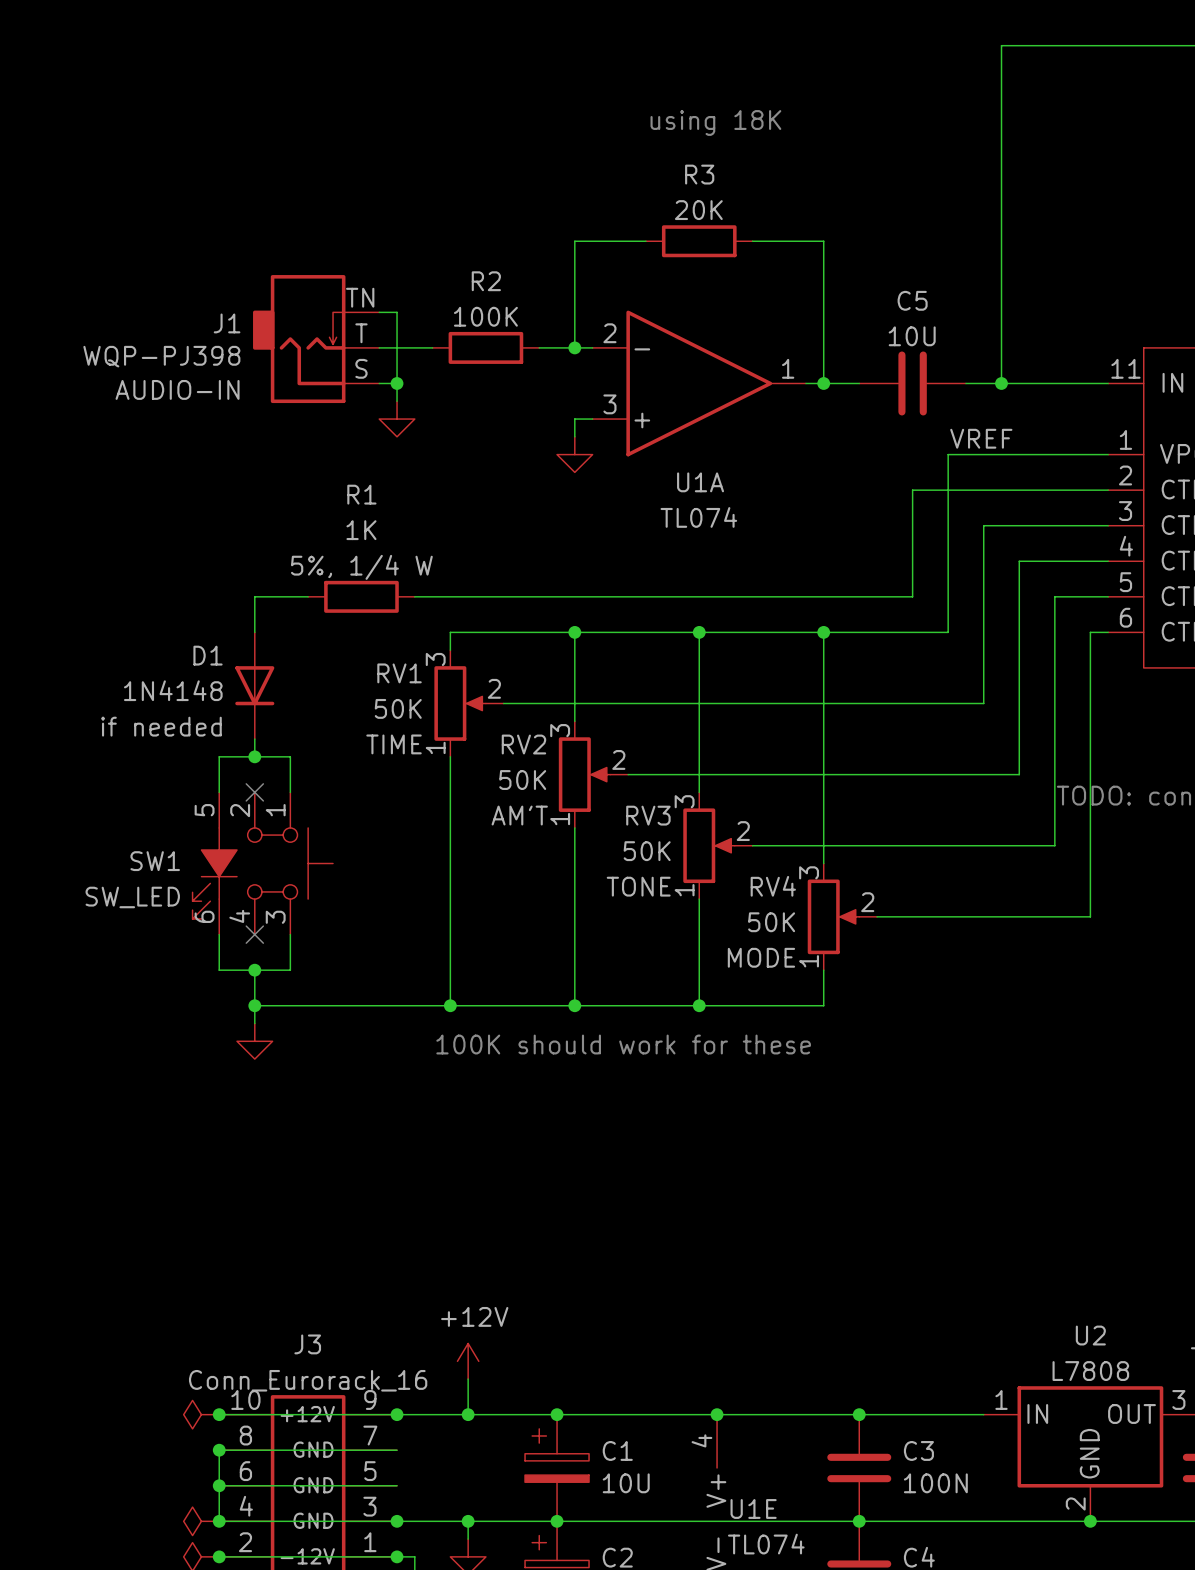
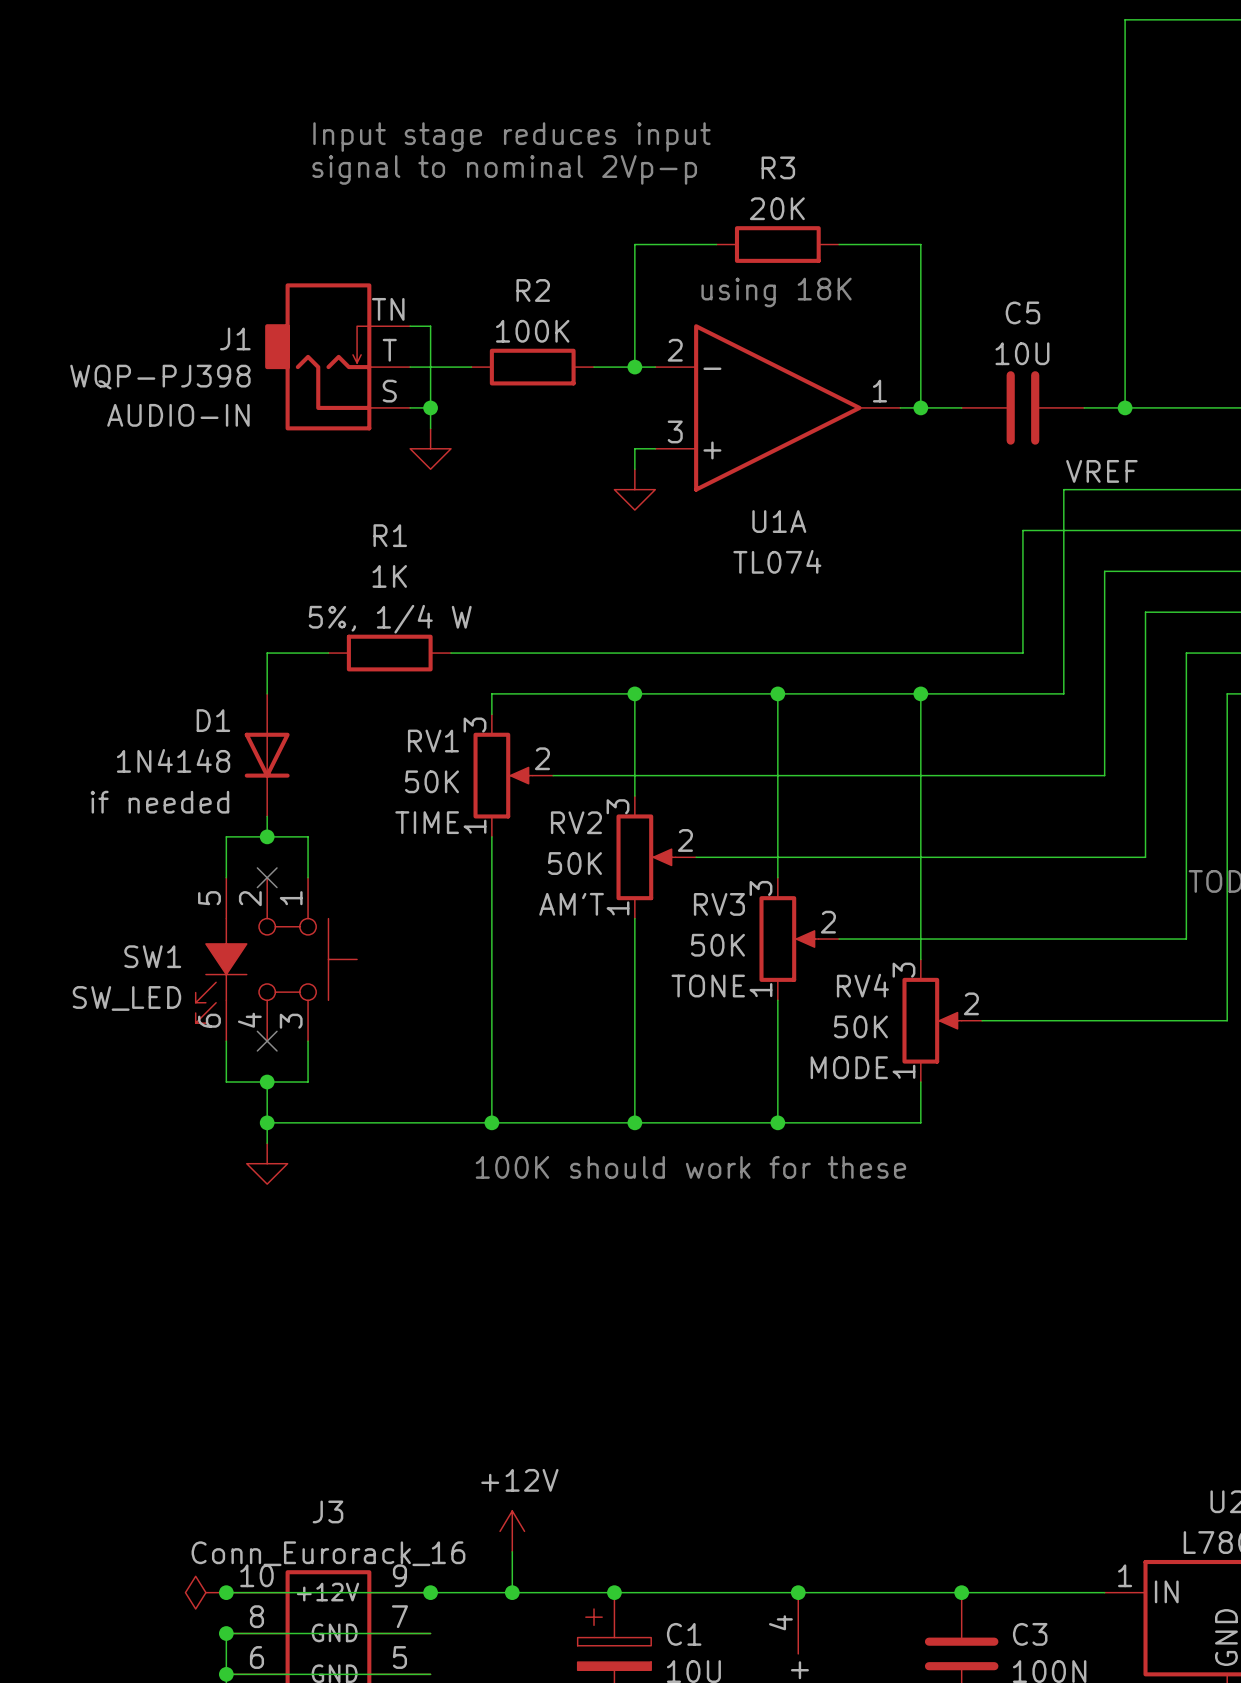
text position: using 18K (715, 122) -> using 18K (776, 292)
text: none -> Input stage reduces input (511, 137)
text: none -> signal to nominal 2Vp-p (504, 169)

